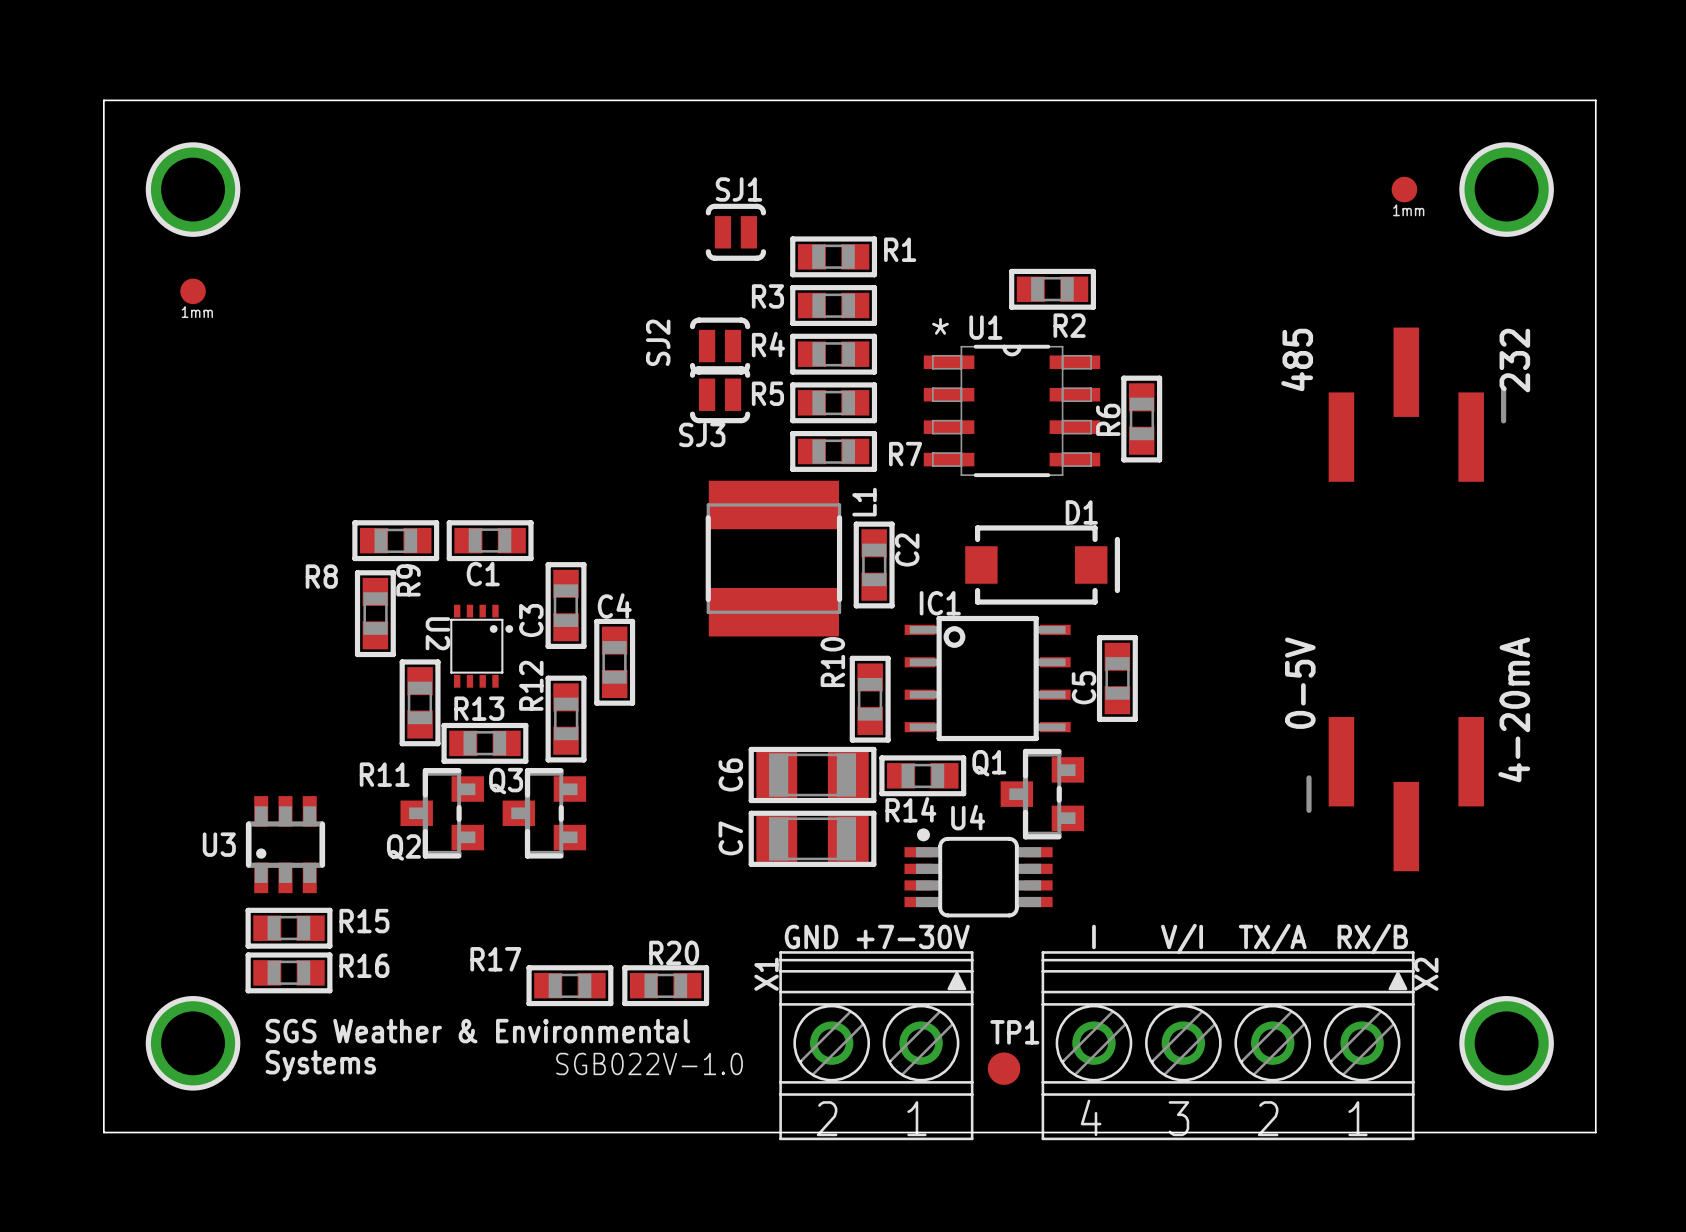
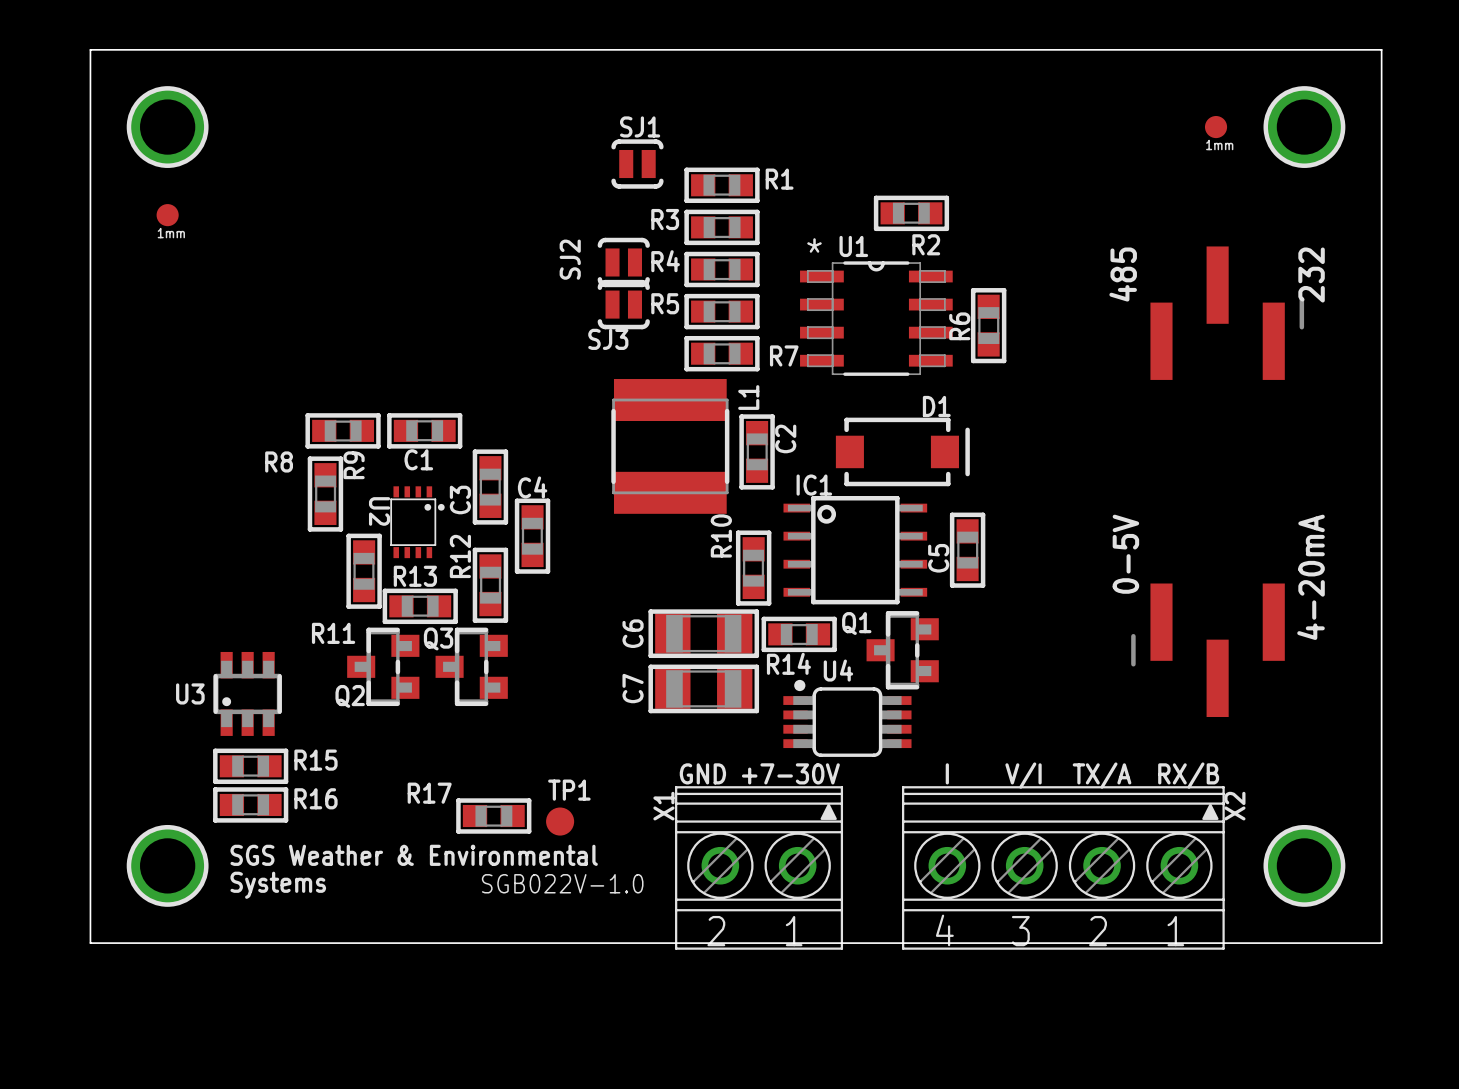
R20: (665, 985) -> none
TP1 position: (1004, 1068) -> (560, 821)

